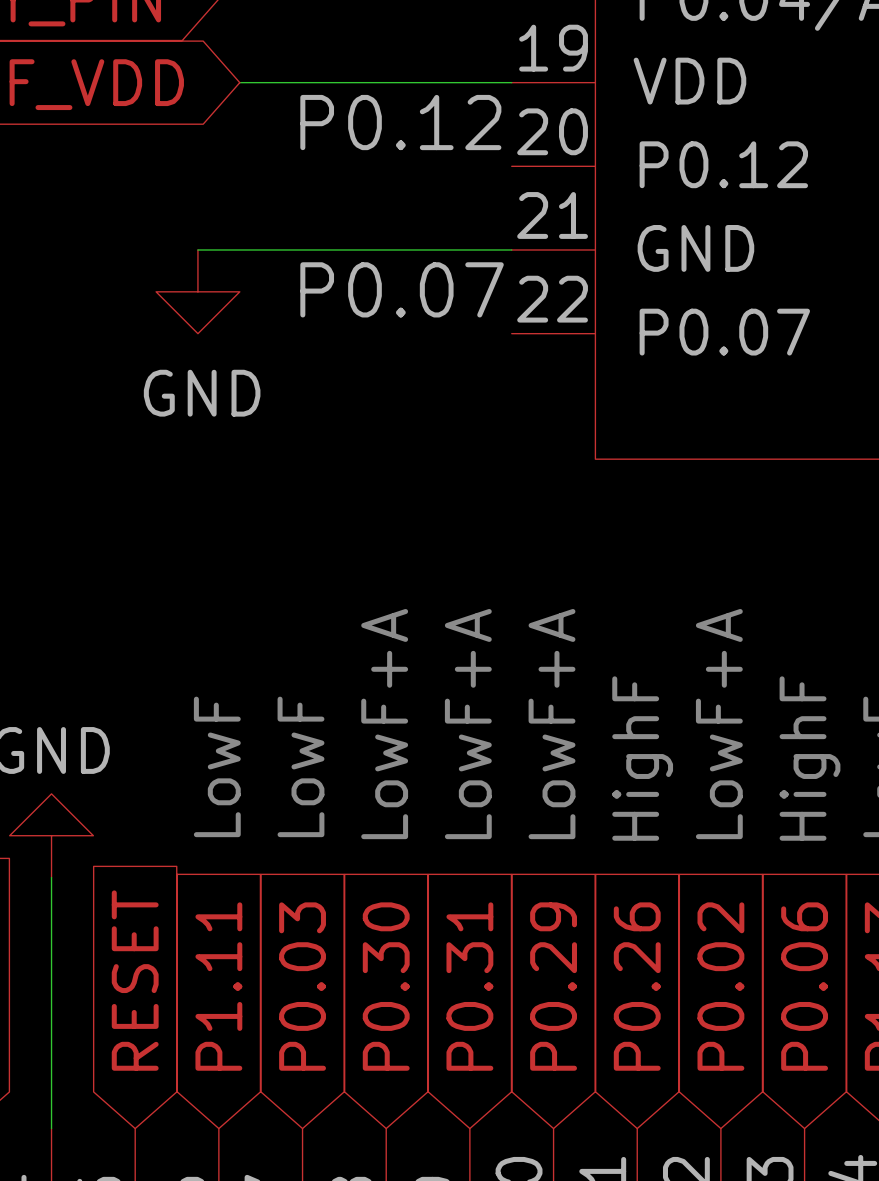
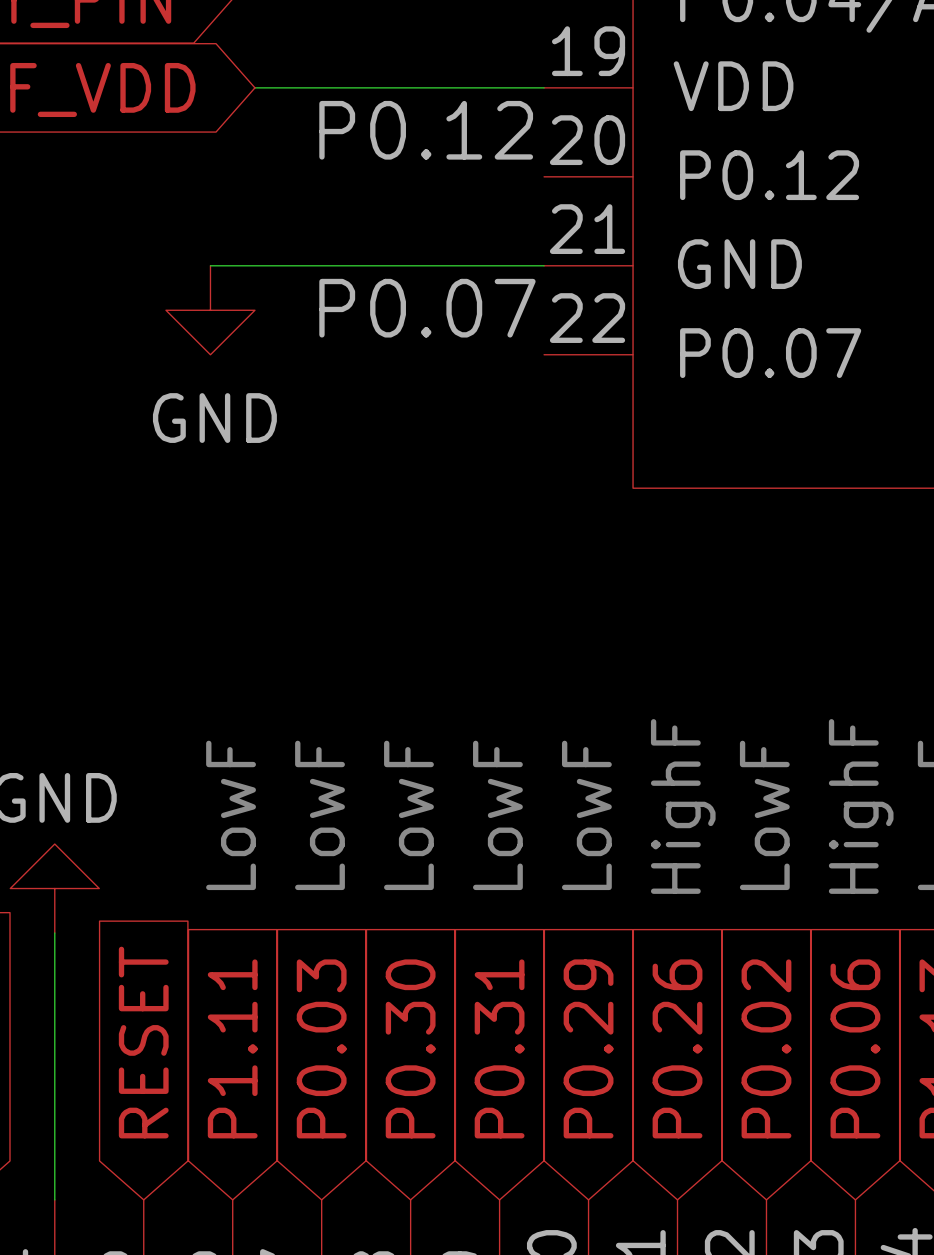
text: LowF+A (384, 724) -> LowF (408, 815)
text: LowF+A (468, 724) -> LowF (497, 815)
text: LowF+A (552, 724) -> LowF (586, 815)
text: LowF+A (719, 724) -> LowF (764, 815)

